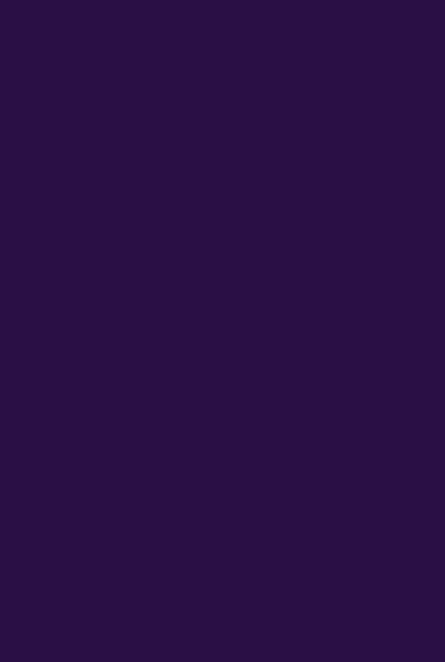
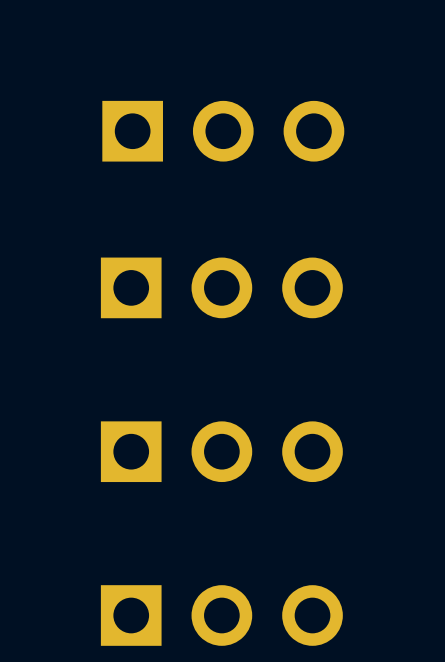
part: none -> (223, 131)
part: none -> (221, 287)
part: none -> (221, 451)
part: none -> (221, 615)

